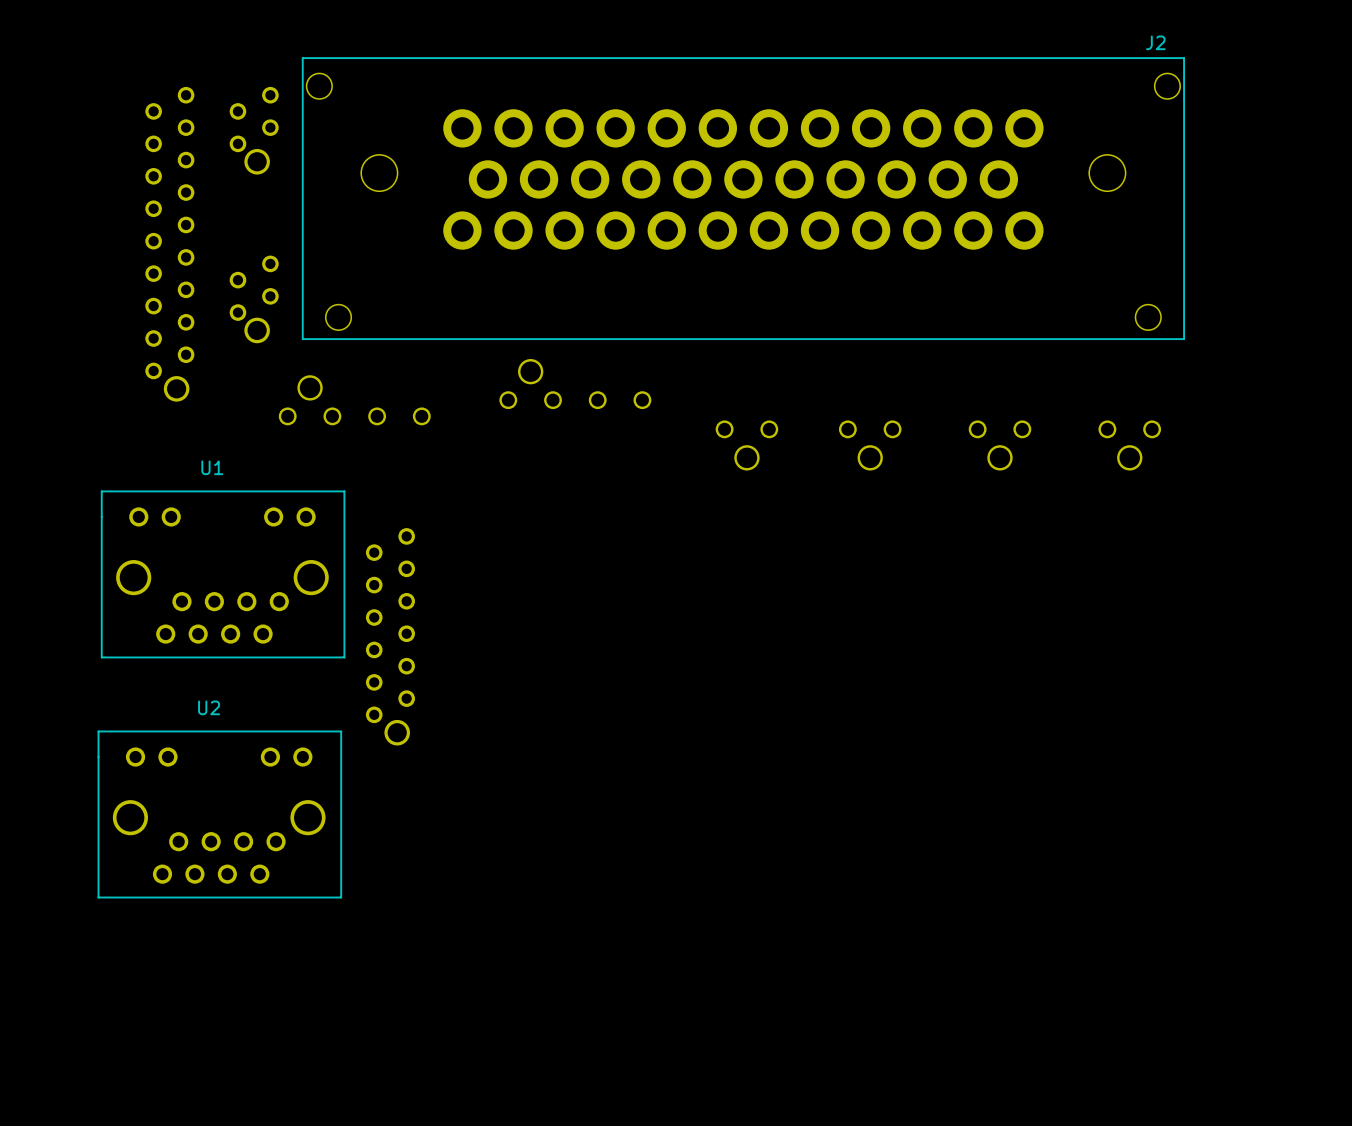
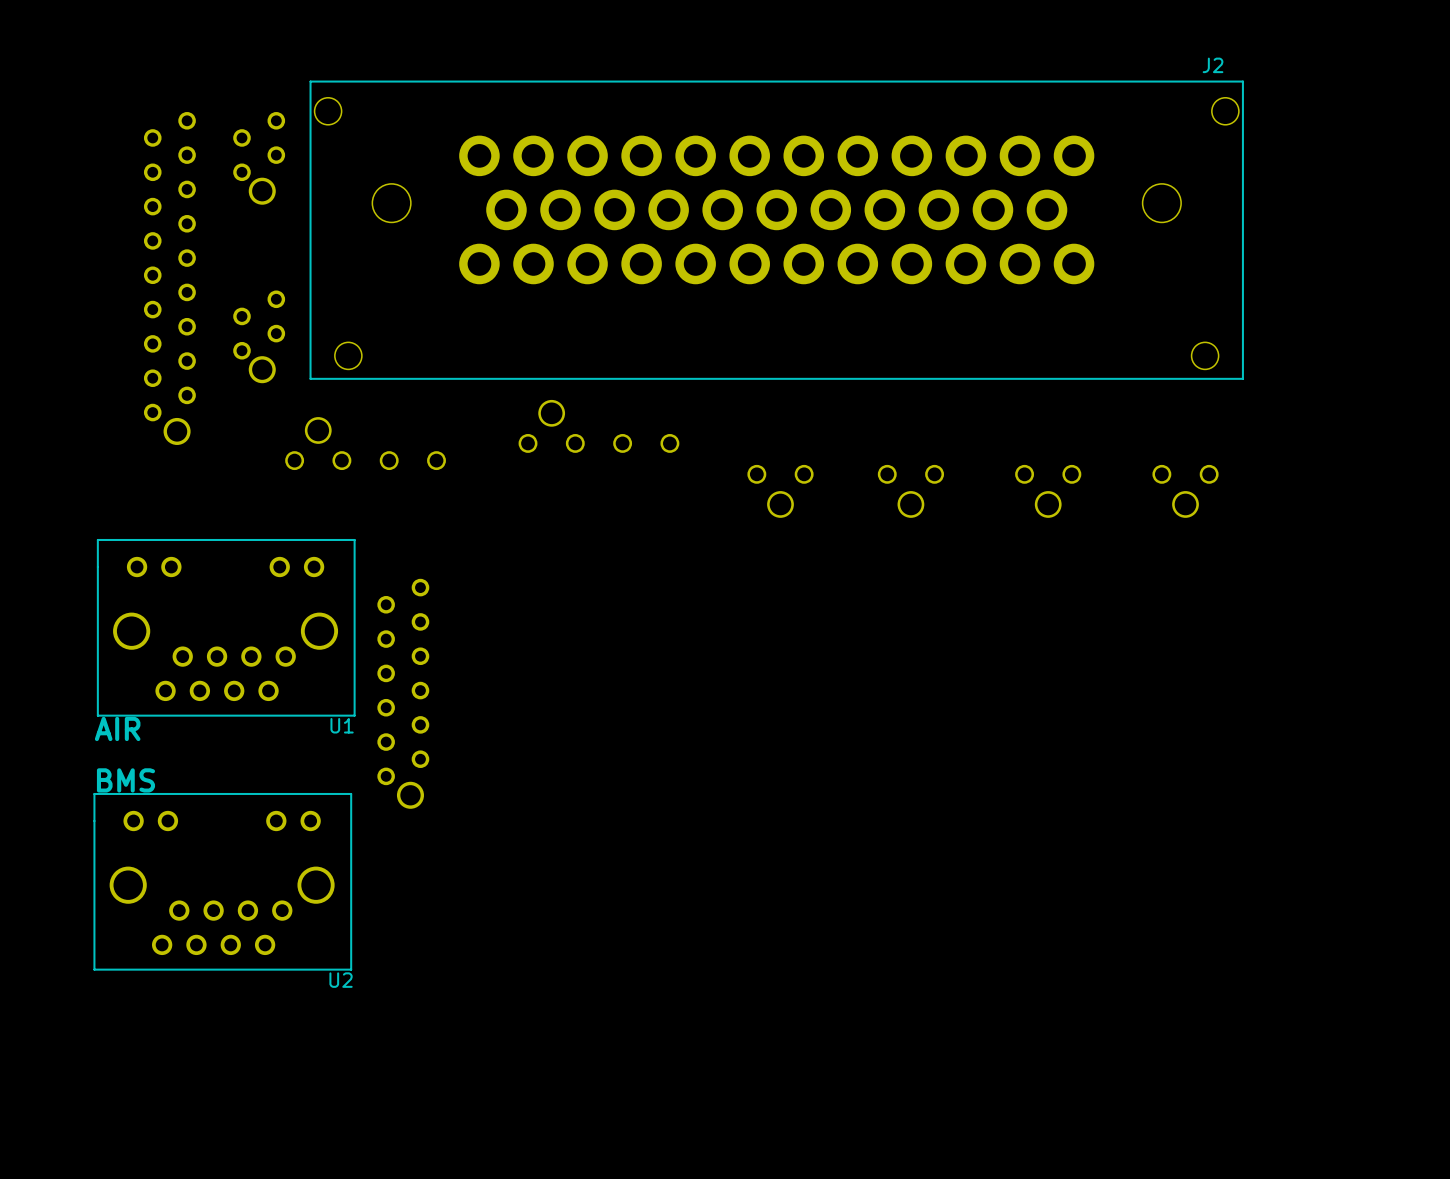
U1 name position: U1 (212, 467) -> U1 (342, 725)
text: none -> AIR (117, 728)
U2 name position: U2 (209, 707) -> U2 (341, 980)
text: none -> BMS (125, 780)

